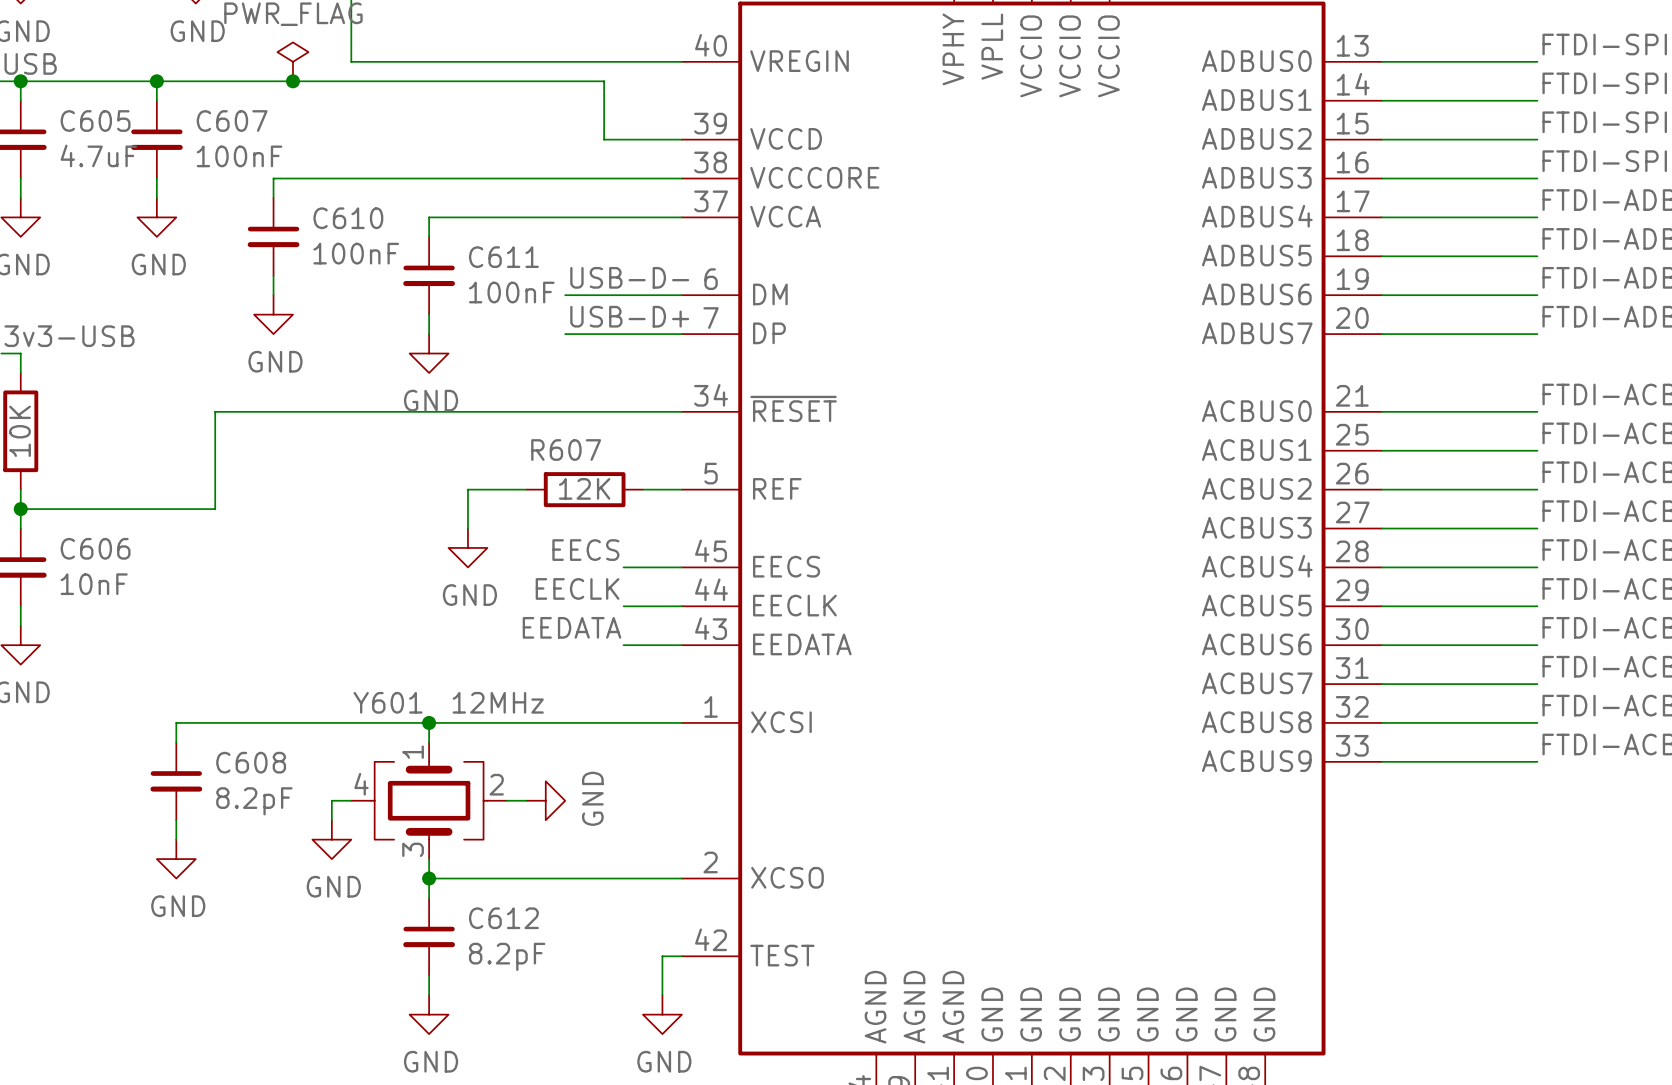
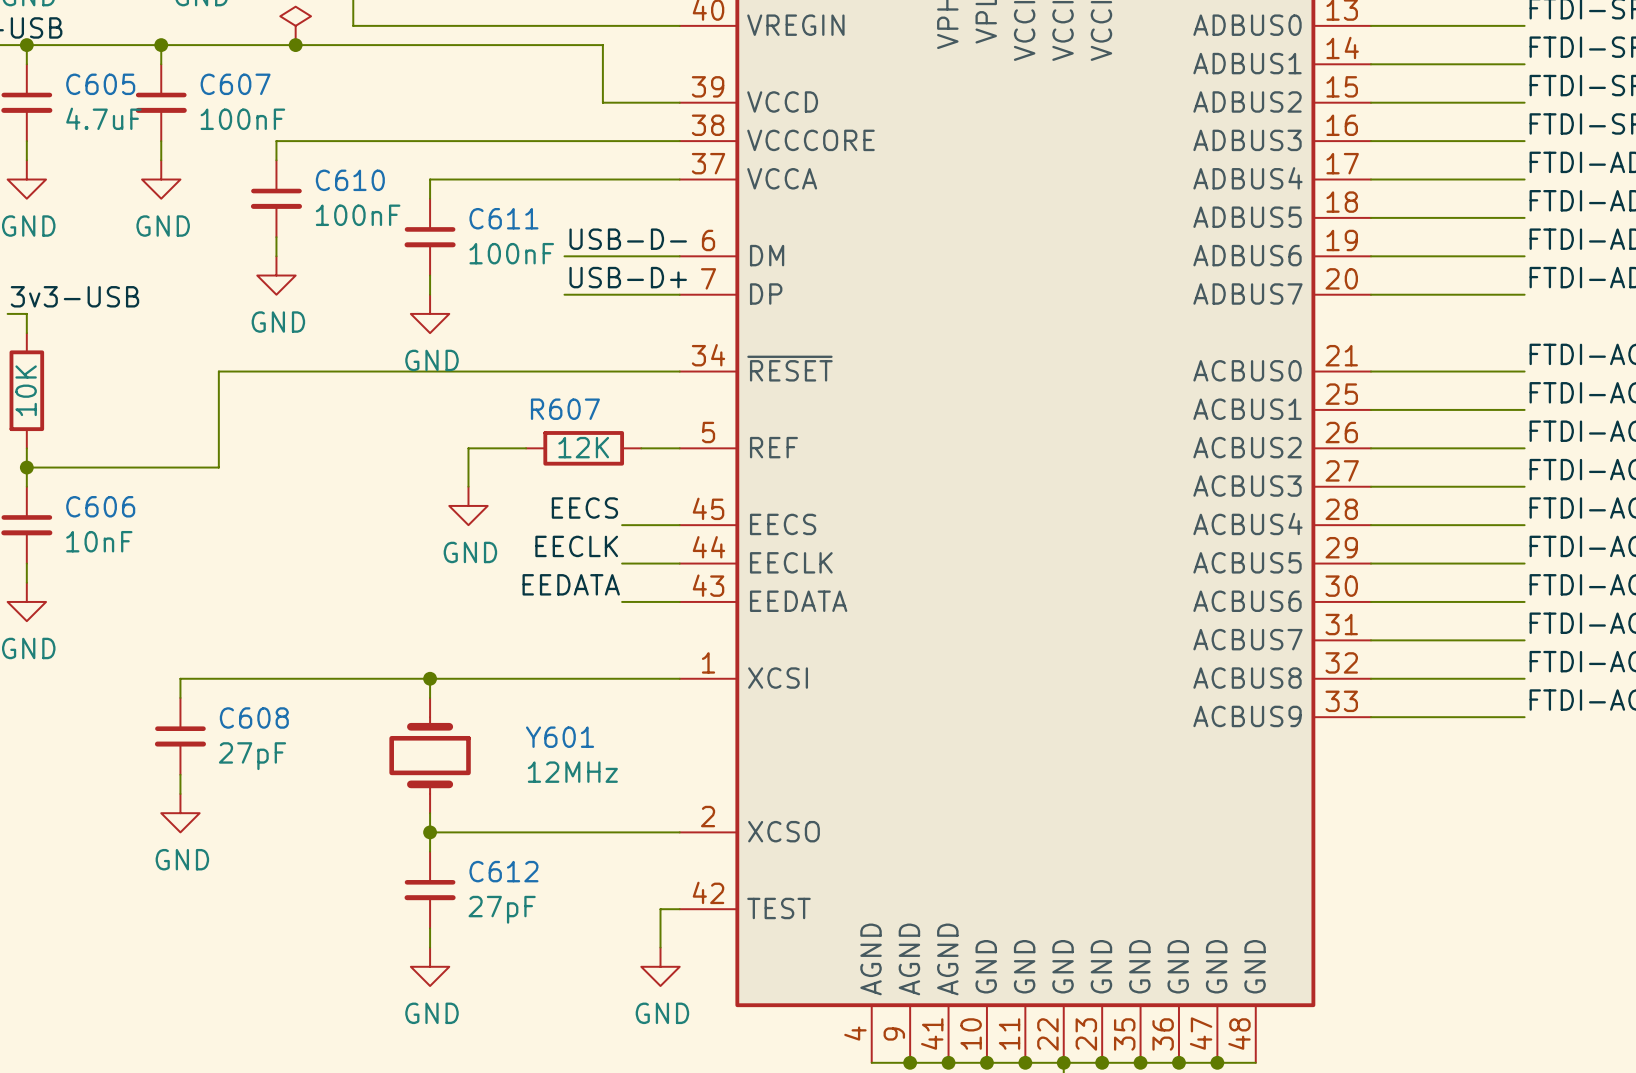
Y601 name position: Y601 (388, 702) -> Y601 (560, 737)
Y601 value position: 12MHz (498, 702) -> 12MHz (572, 772)
Y601 symbol: [351, 742, 507, 860] -> [389, 697, 471, 814]
wire: (351, 800) (331, 800) (331, 820) -> none
wire: (506, 800) (526, 800) -> none
power symbol: GND (545, 800) -> none
C608 value: 8.2pF (254, 801) -> 27pF (252, 756)
power symbol: GND (331, 839) -> none
C612 value: 8.2pF (507, 956) -> 27pF (502, 909)

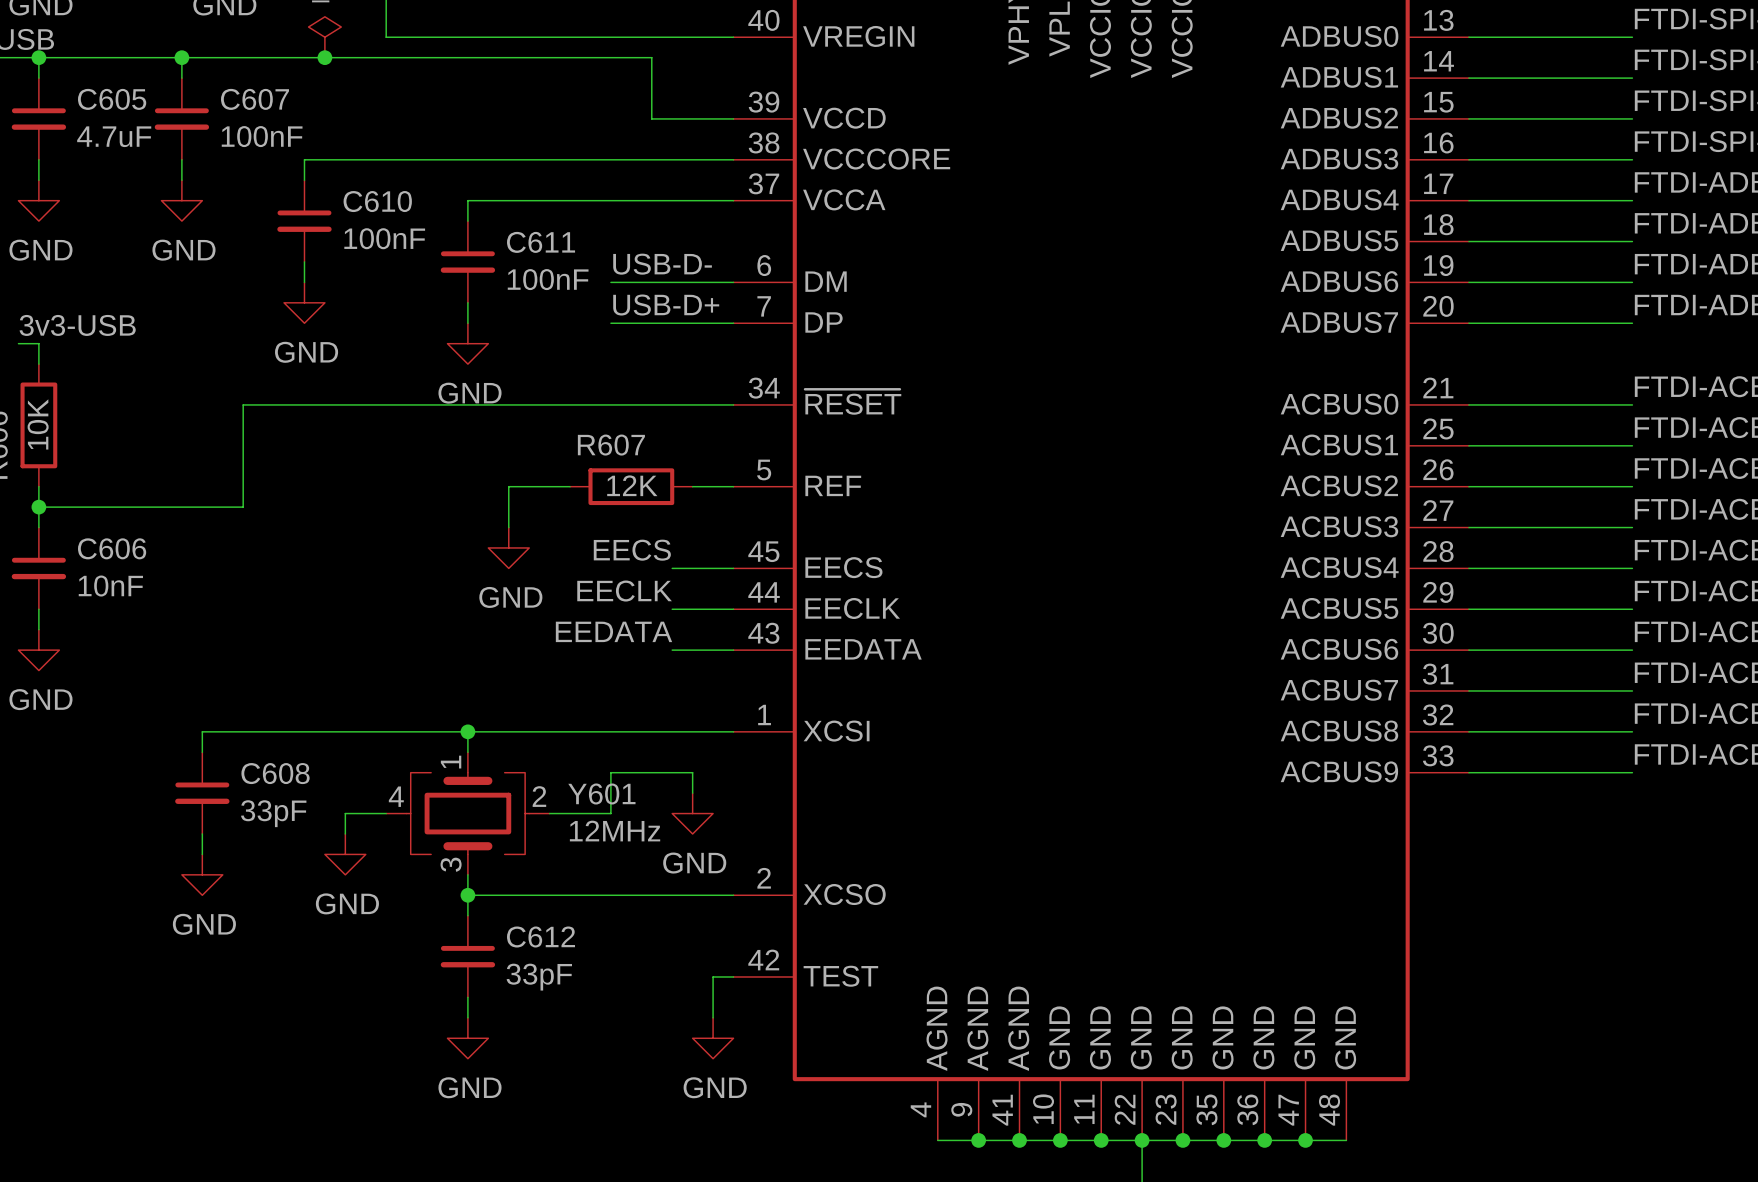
Y601 symbol: [389, 697, 471, 814] -> [386, 752, 550, 875]
wire: none -> (692, 793) (692, 772) (610, 772) (610, 813) (549, 813)
wire: none -> (386, 813) (345, 813) (345, 833)
power symbol: none -> GND (692, 813)
C608 value: 27pF (252, 756) -> 33pF (273, 813)
power symbol: none -> GND (345, 854)
C612 value: 27pF (502, 909) -> 33pF (539, 977)

